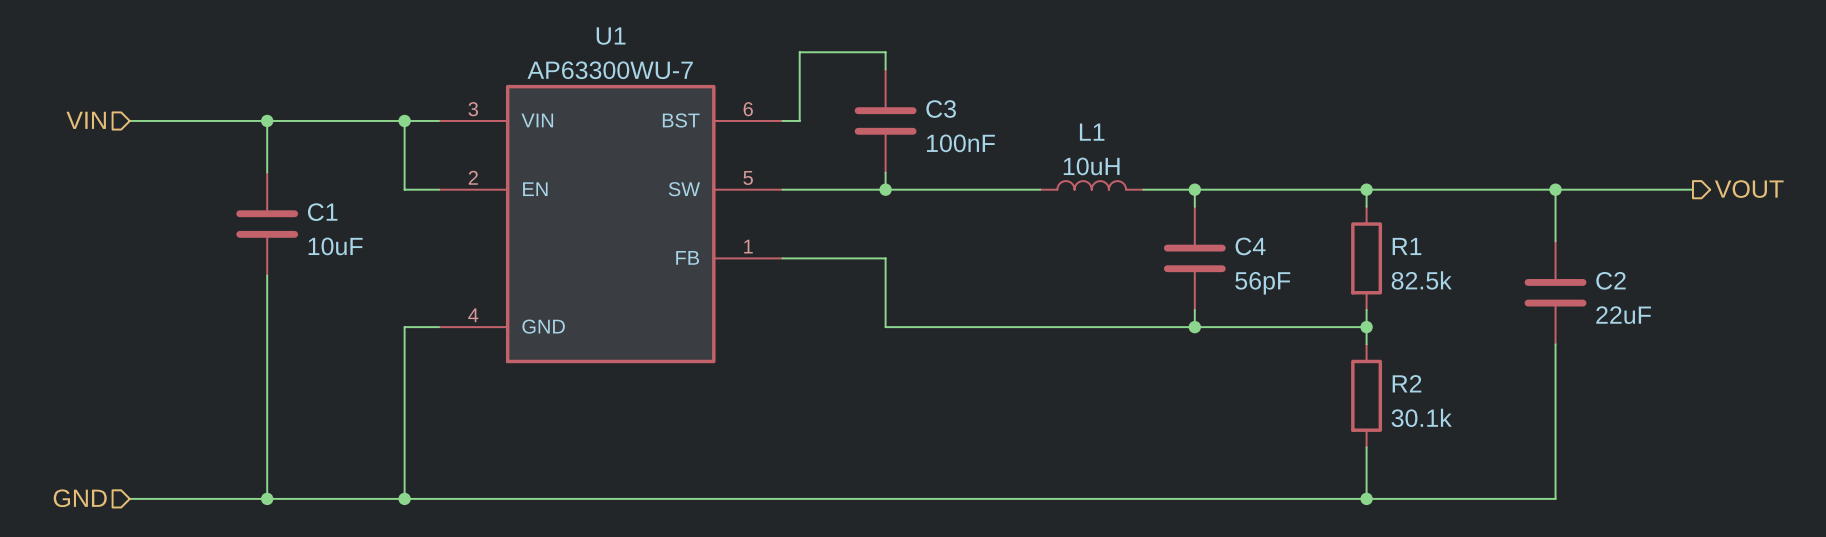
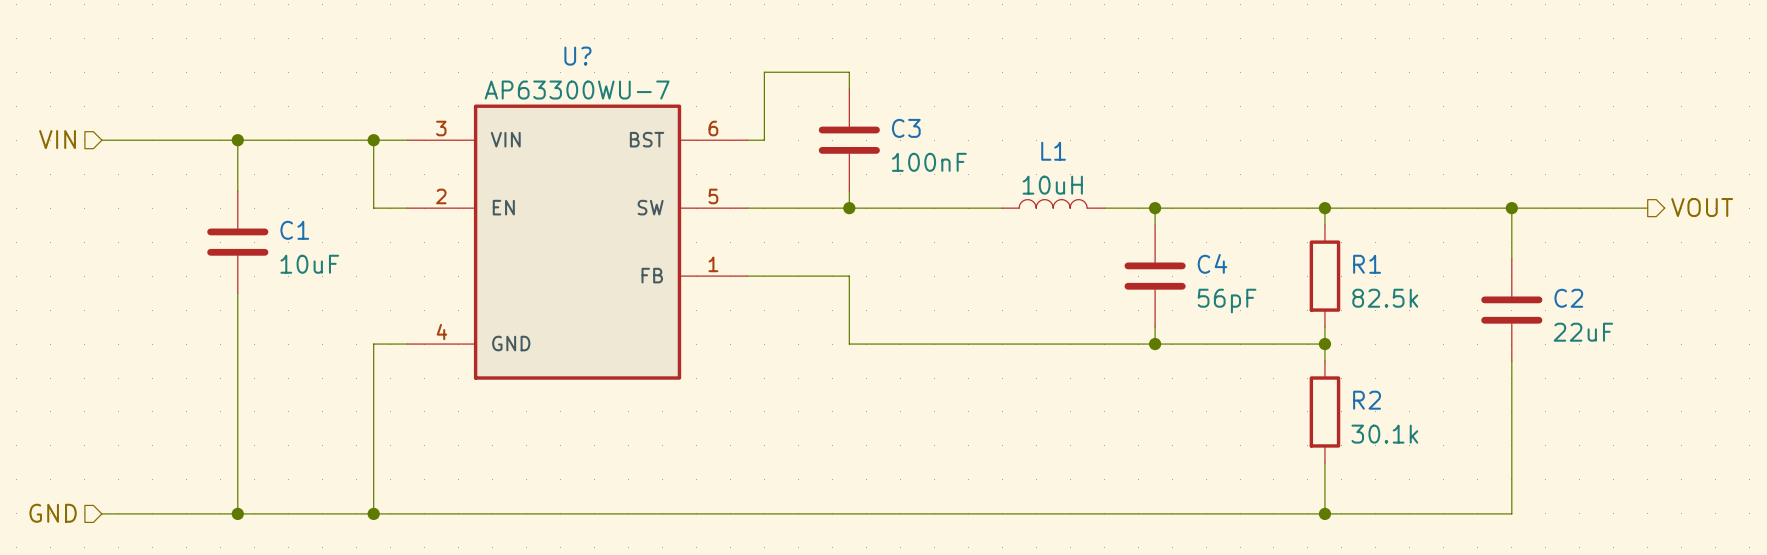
U1 name: U1 (611, 36) -> U? (577, 56)

